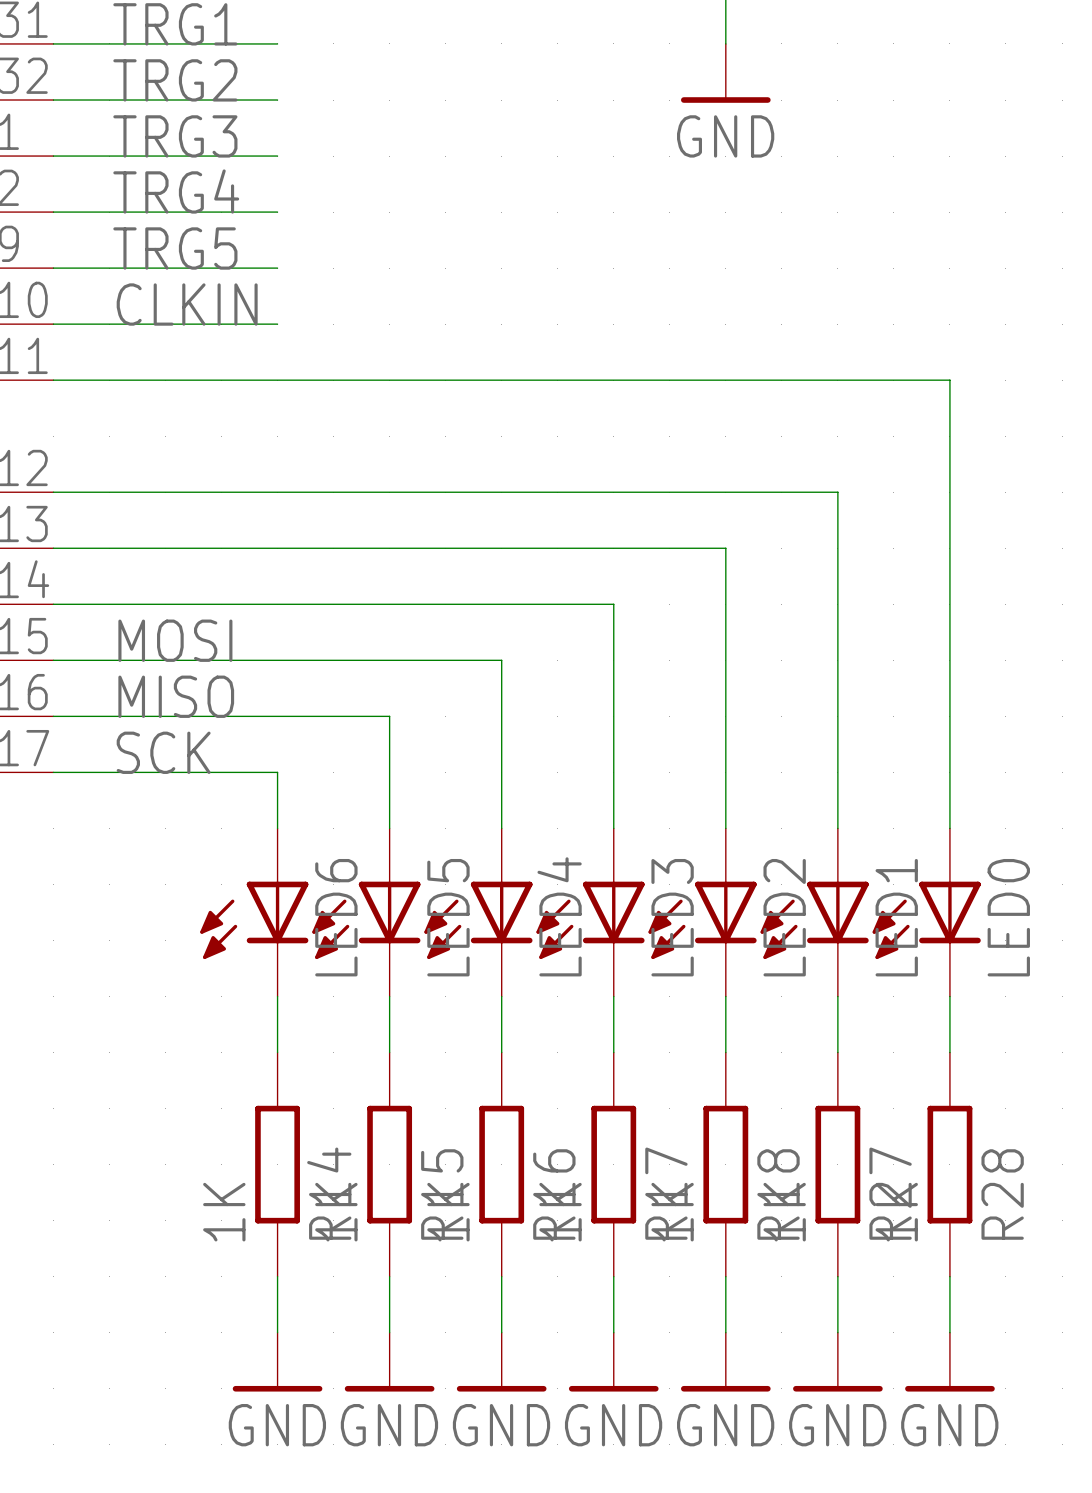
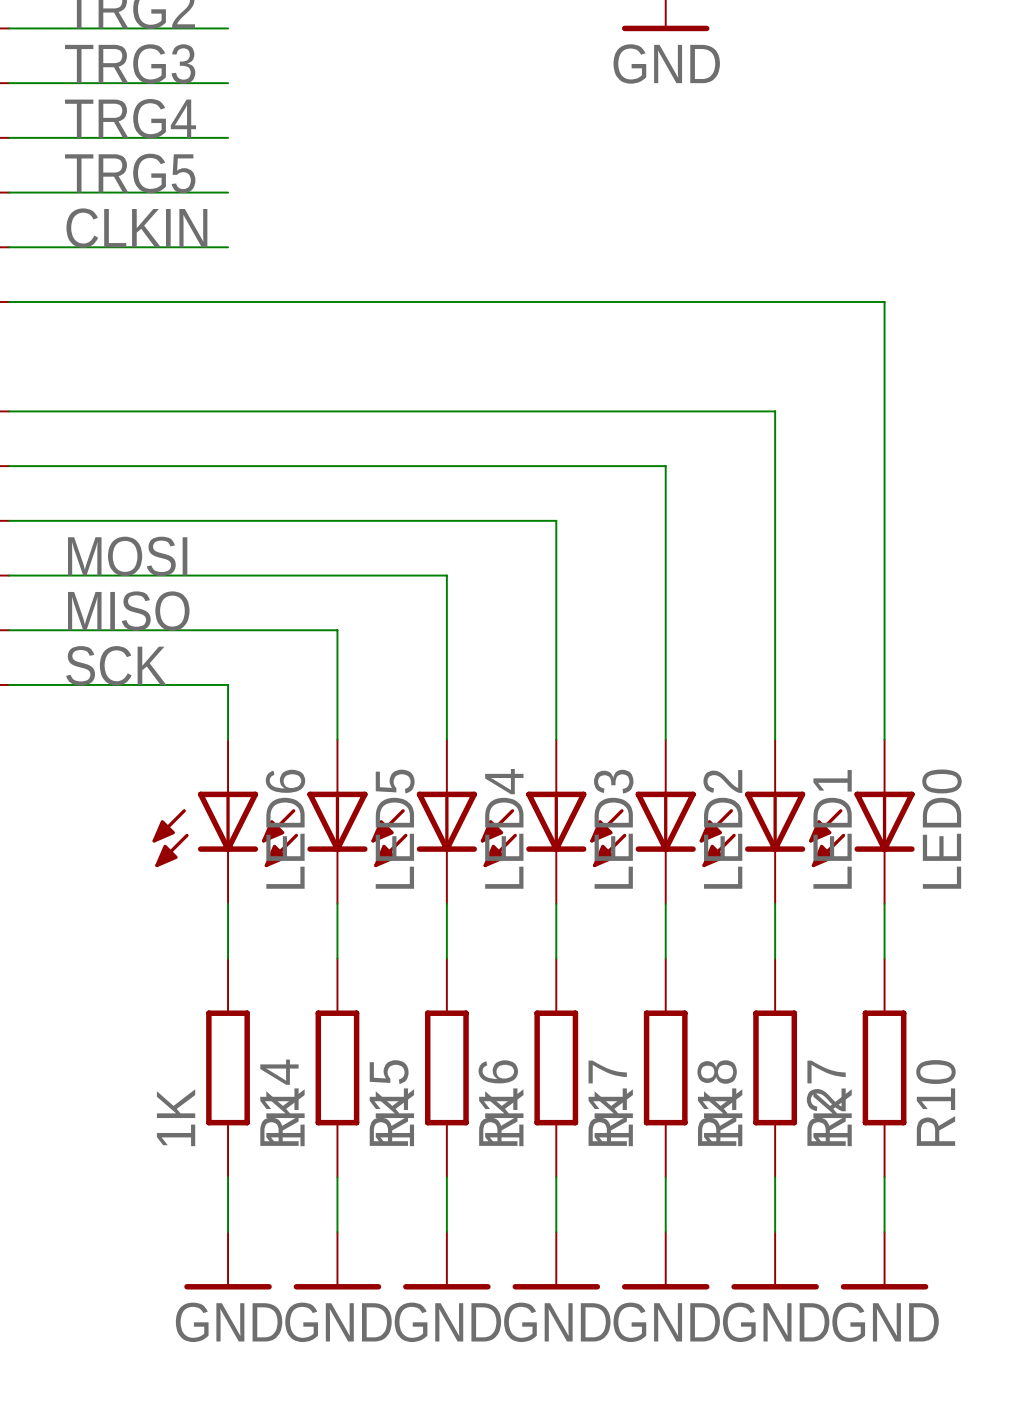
R28 name: R28 (1002, 1194) -> R10 (935, 1102)

